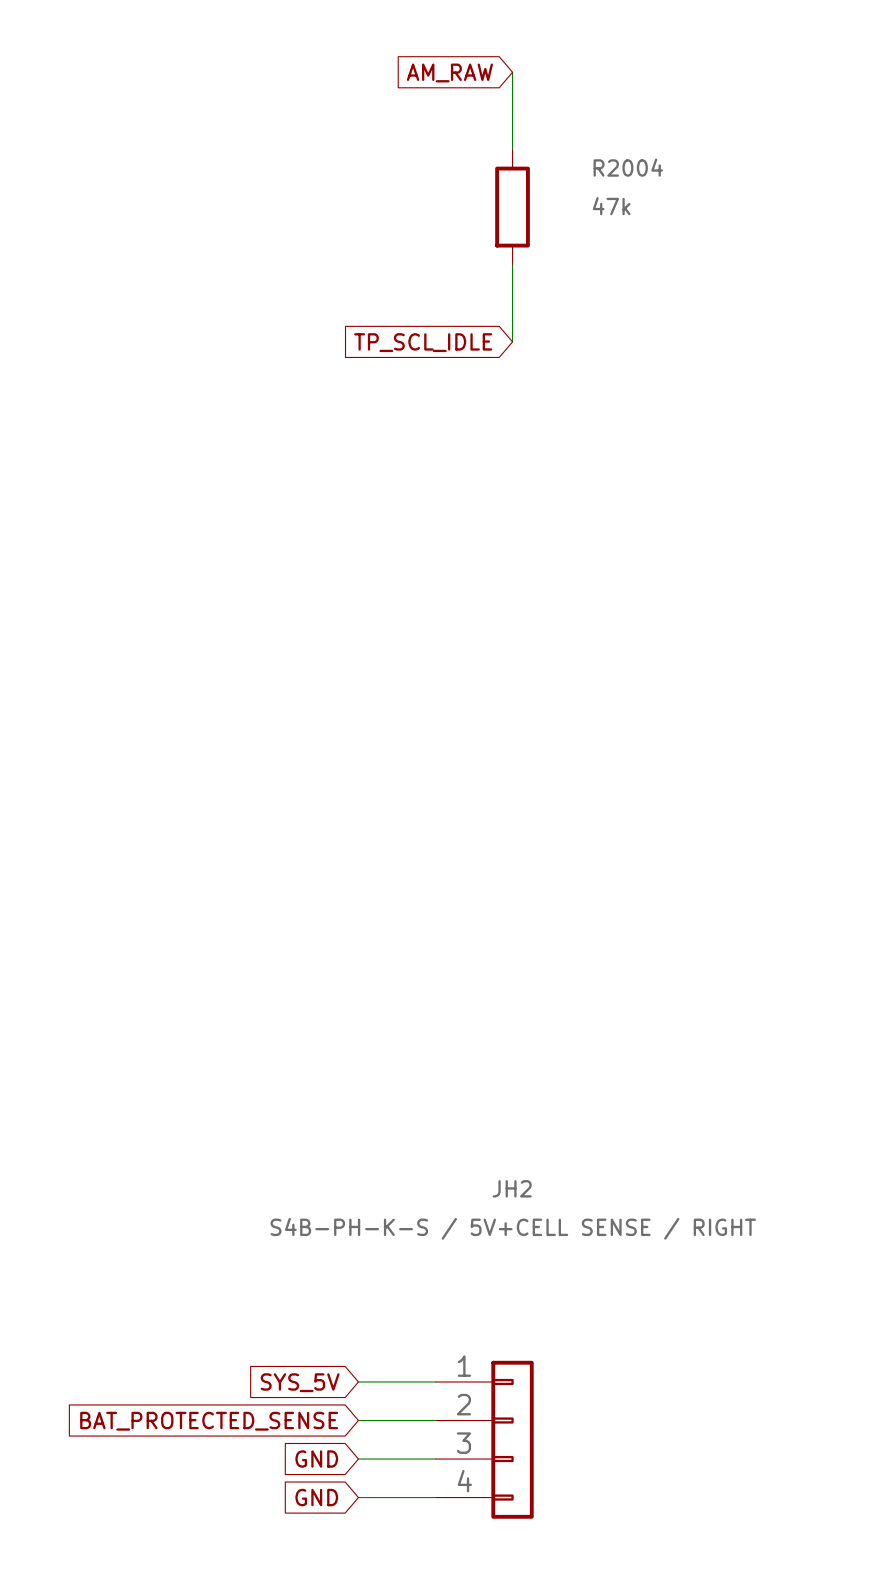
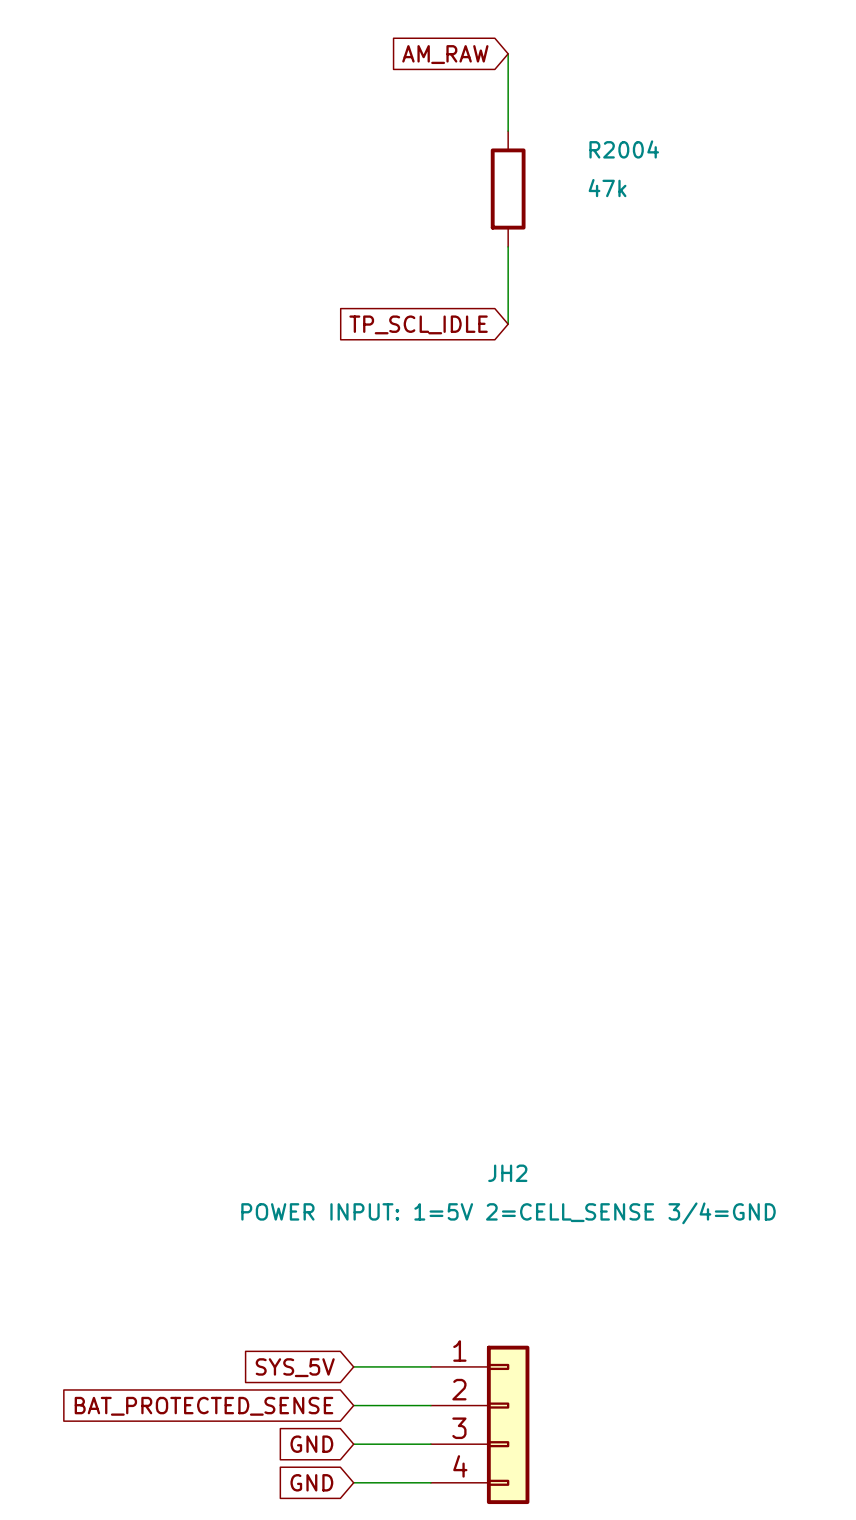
JH2 value: S4B-PH-K-S / 5V+CELL SENSE / RIGHT (513, 1228) -> POWER INPUT: 1=5V 2=CELL_SENSE 3/4=GND (508, 1213)

